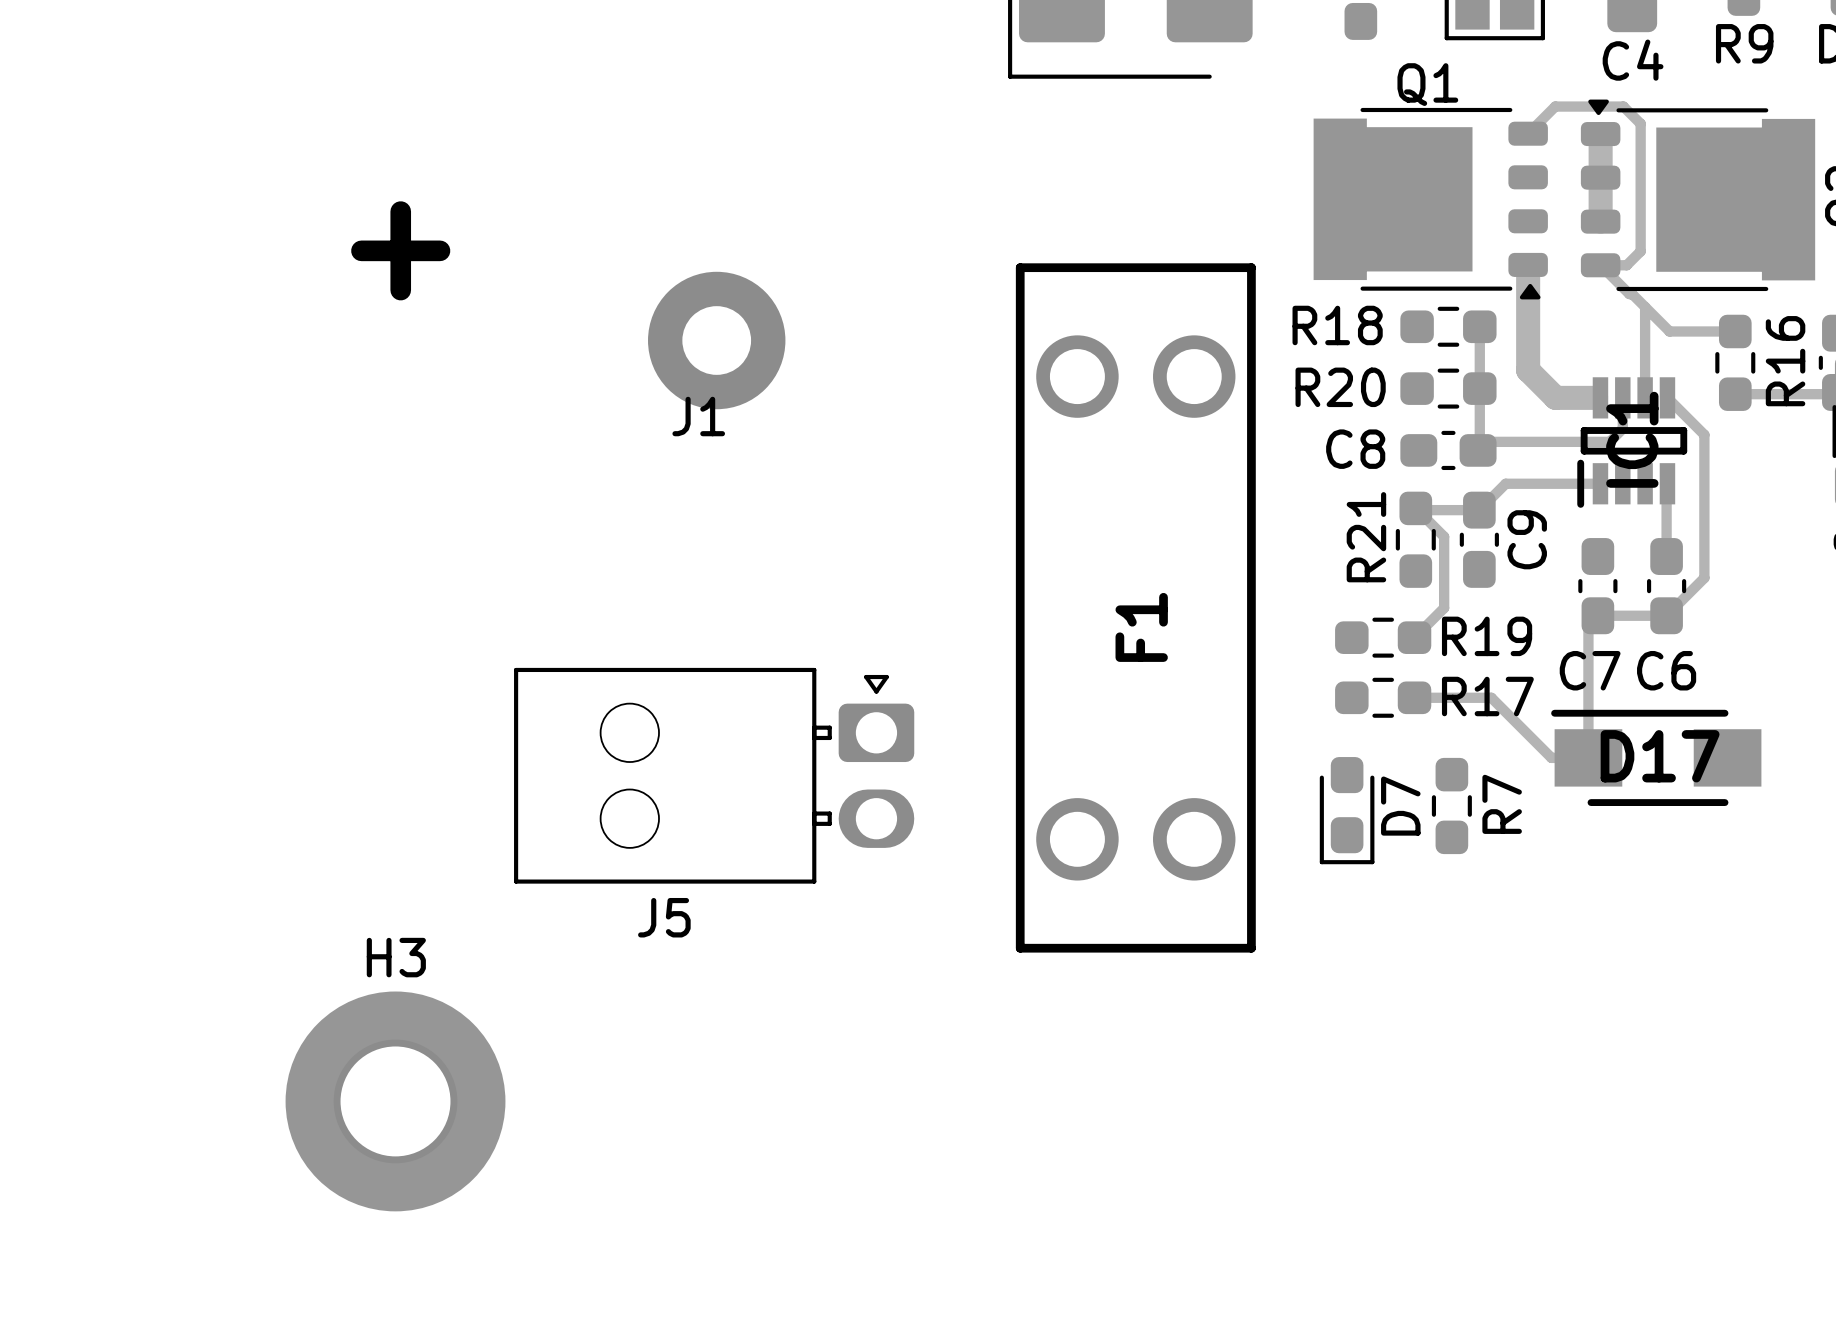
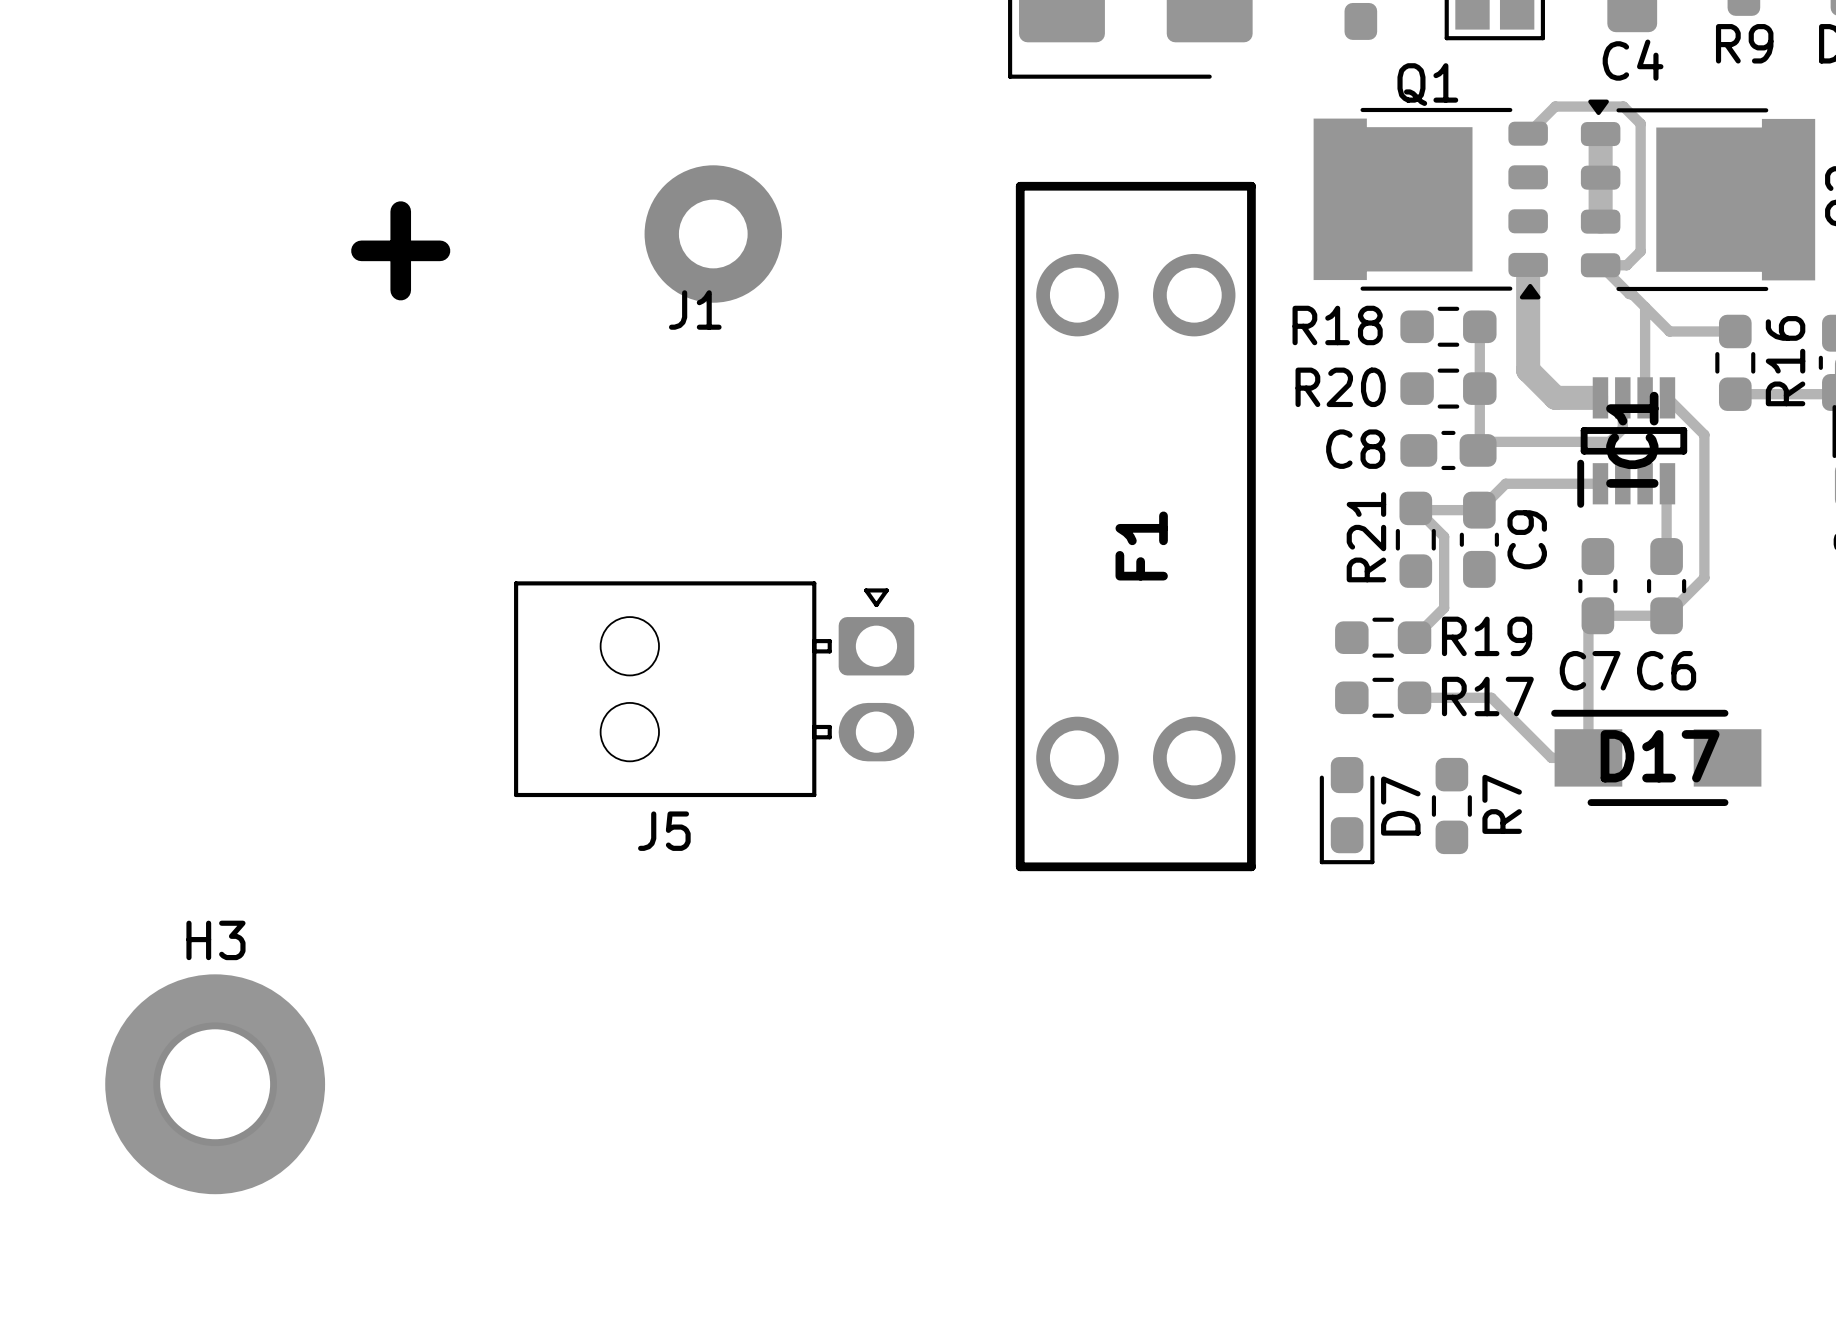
J1 position: (716, 340) -> (713, 234)
F1 position: (1135, 607) -> (1135, 526)
J5 position: (714, 775) -> (714, 689)
H3 position: (395, 1101) -> (215, 1084)

